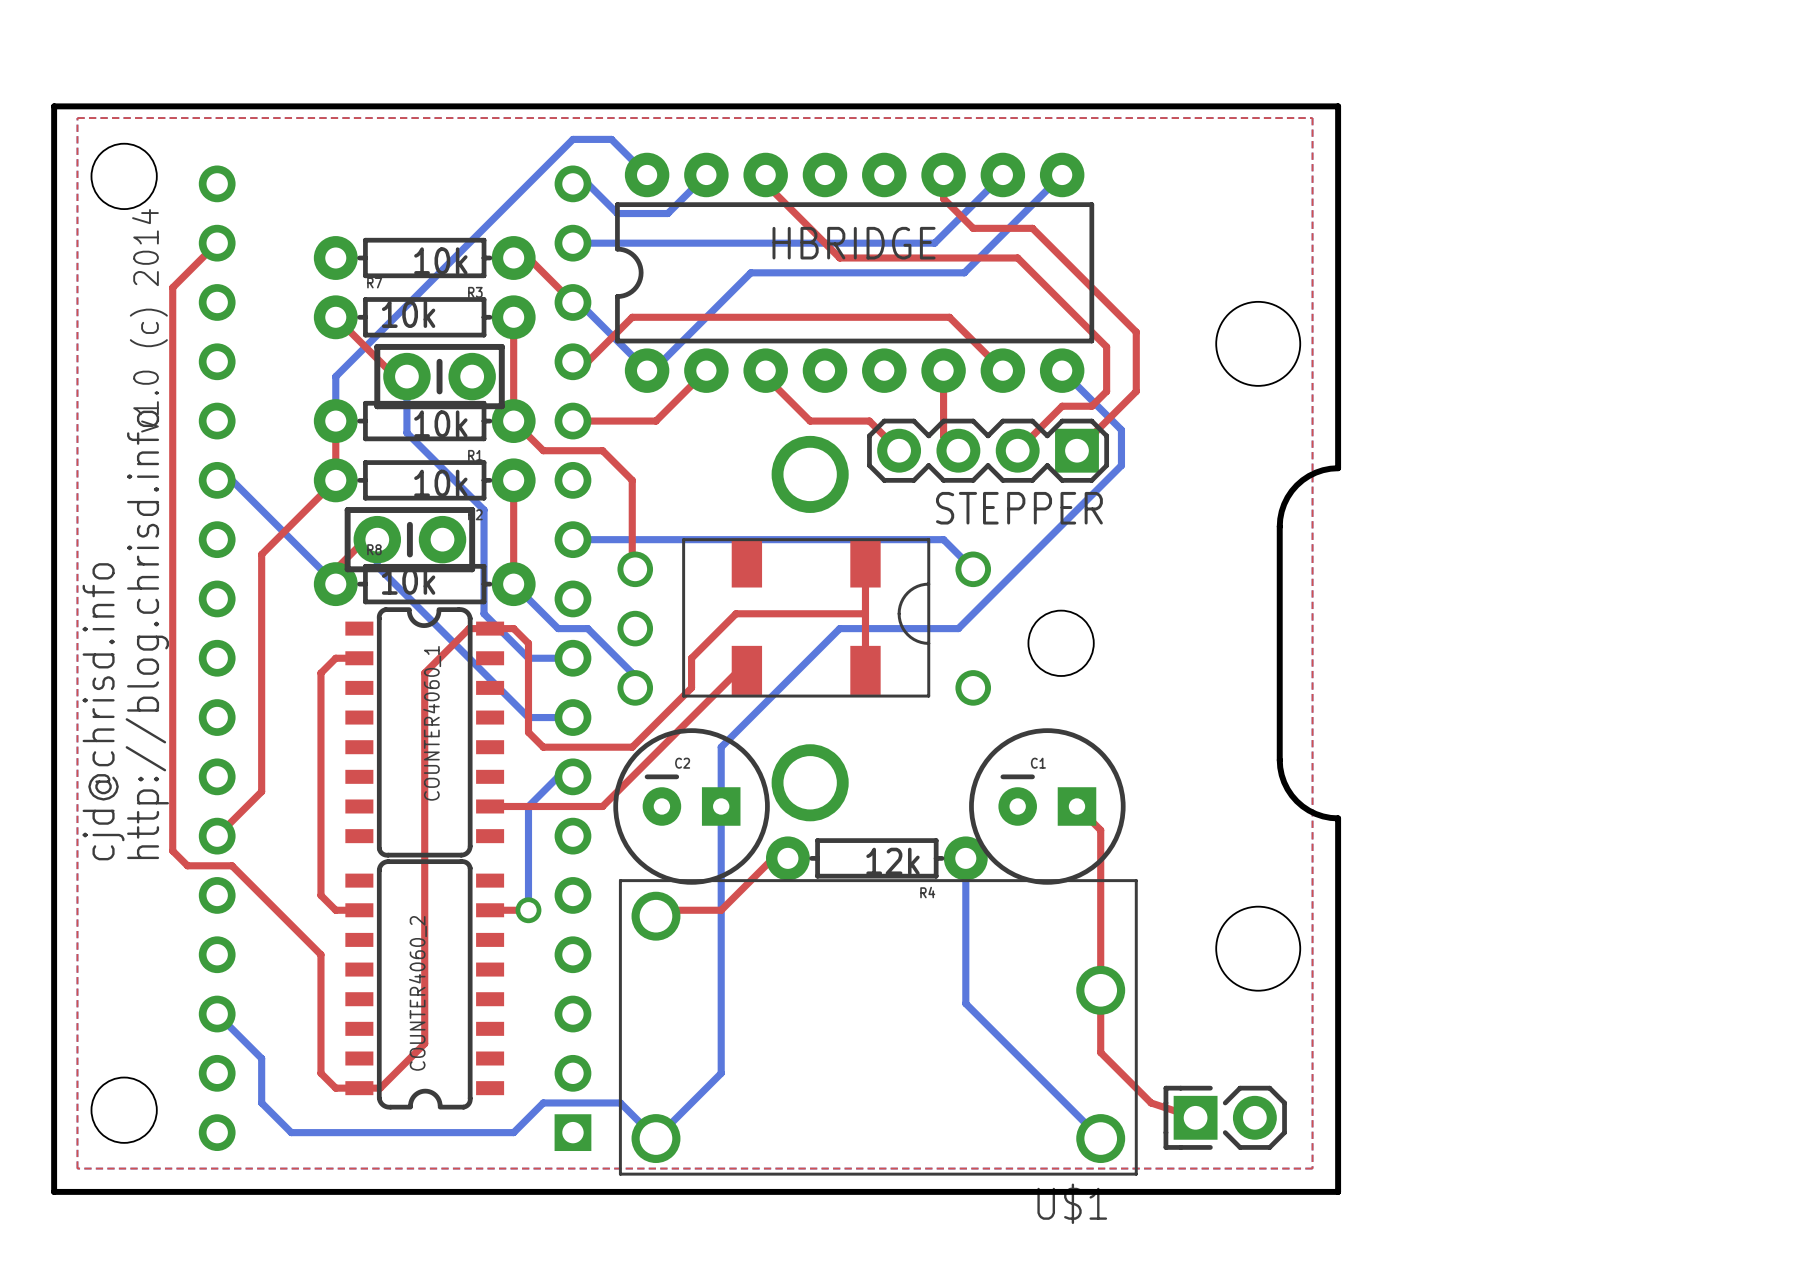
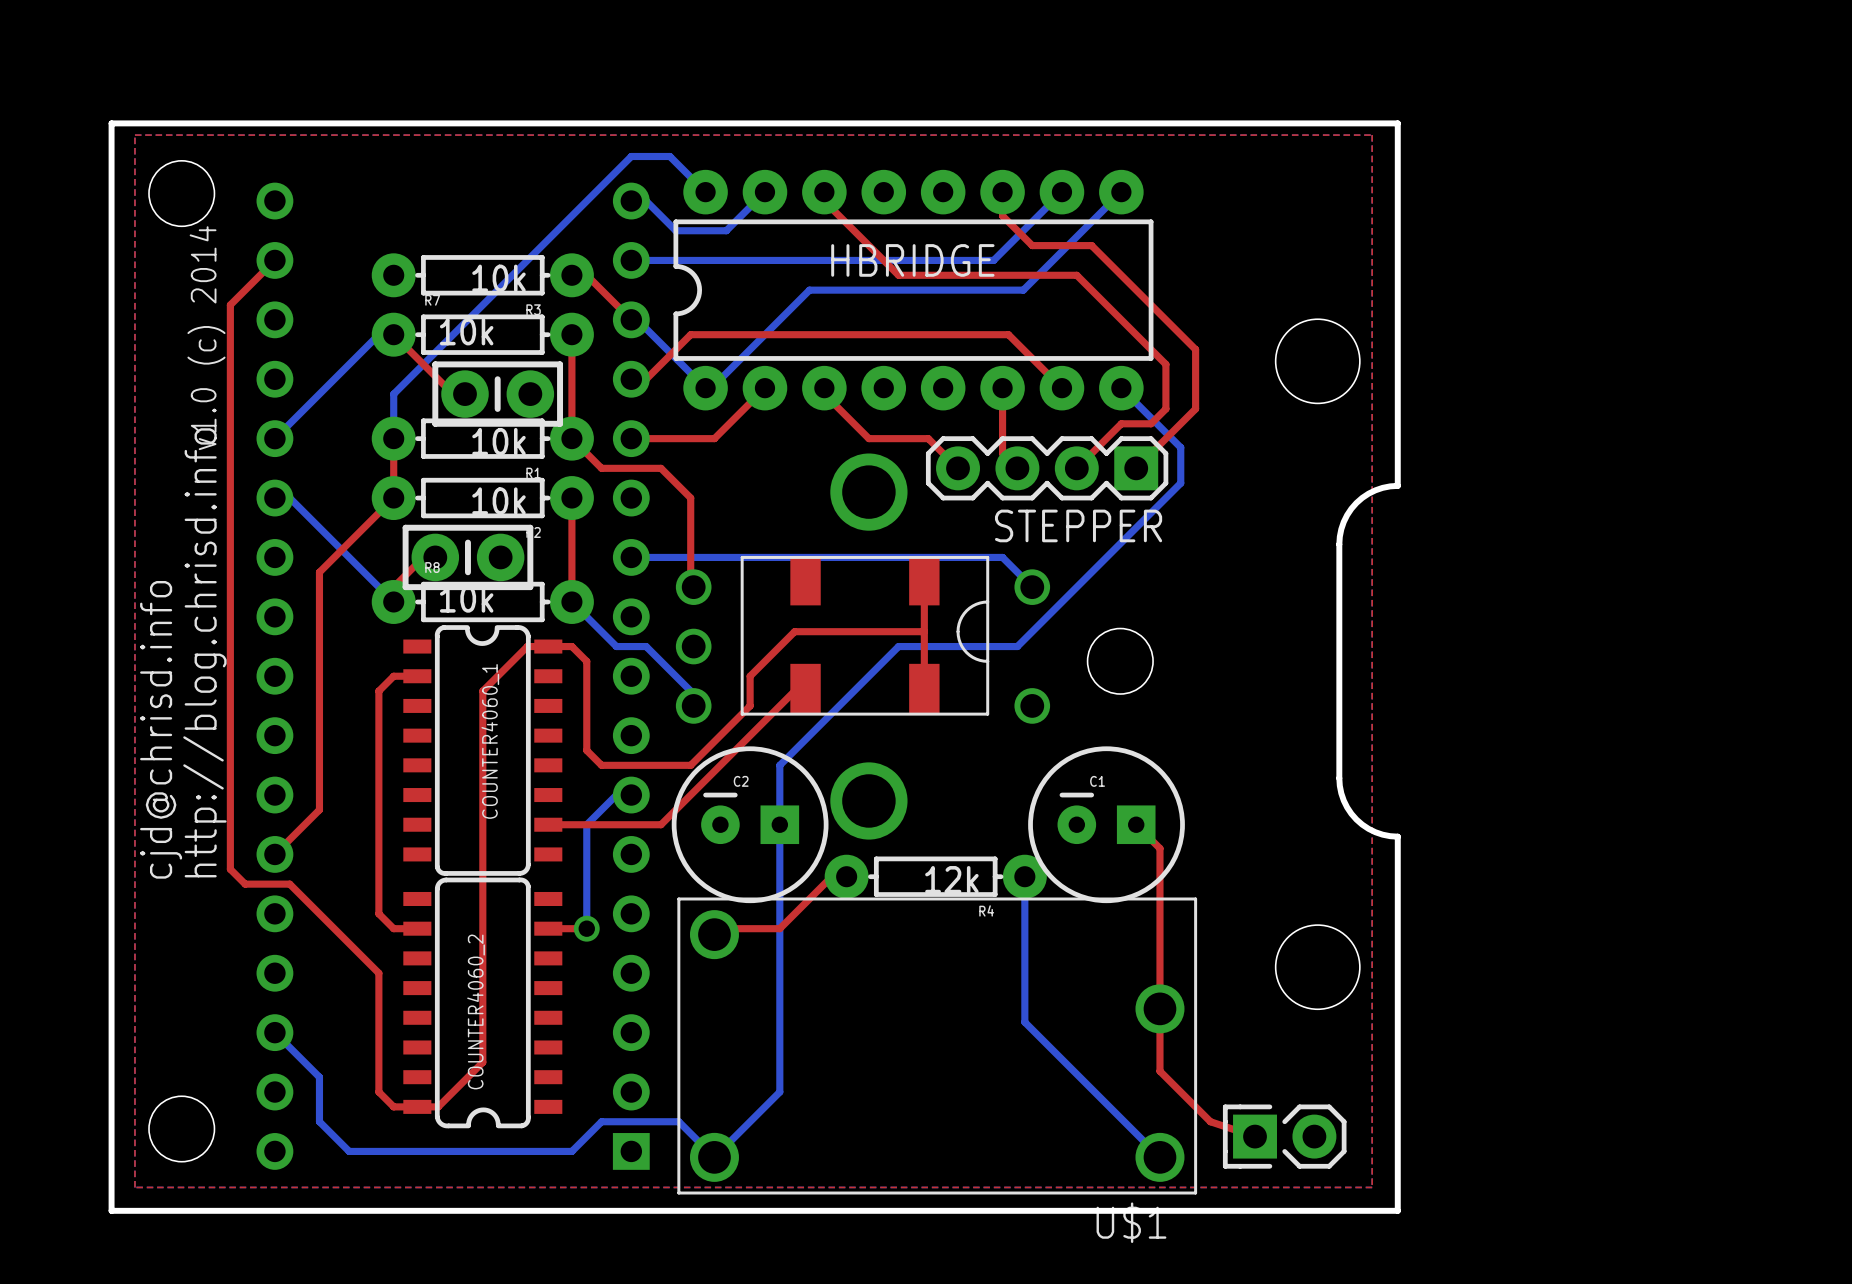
bottom track: none -> (378, 334) (274, 438)
bottom track: (406, 376) (406, 432) (484, 510) (484, 613) (528, 658) (572, 658) -> none
bottom track: (377, 539) (377, 566) (528, 717) (572, 717) -> none

